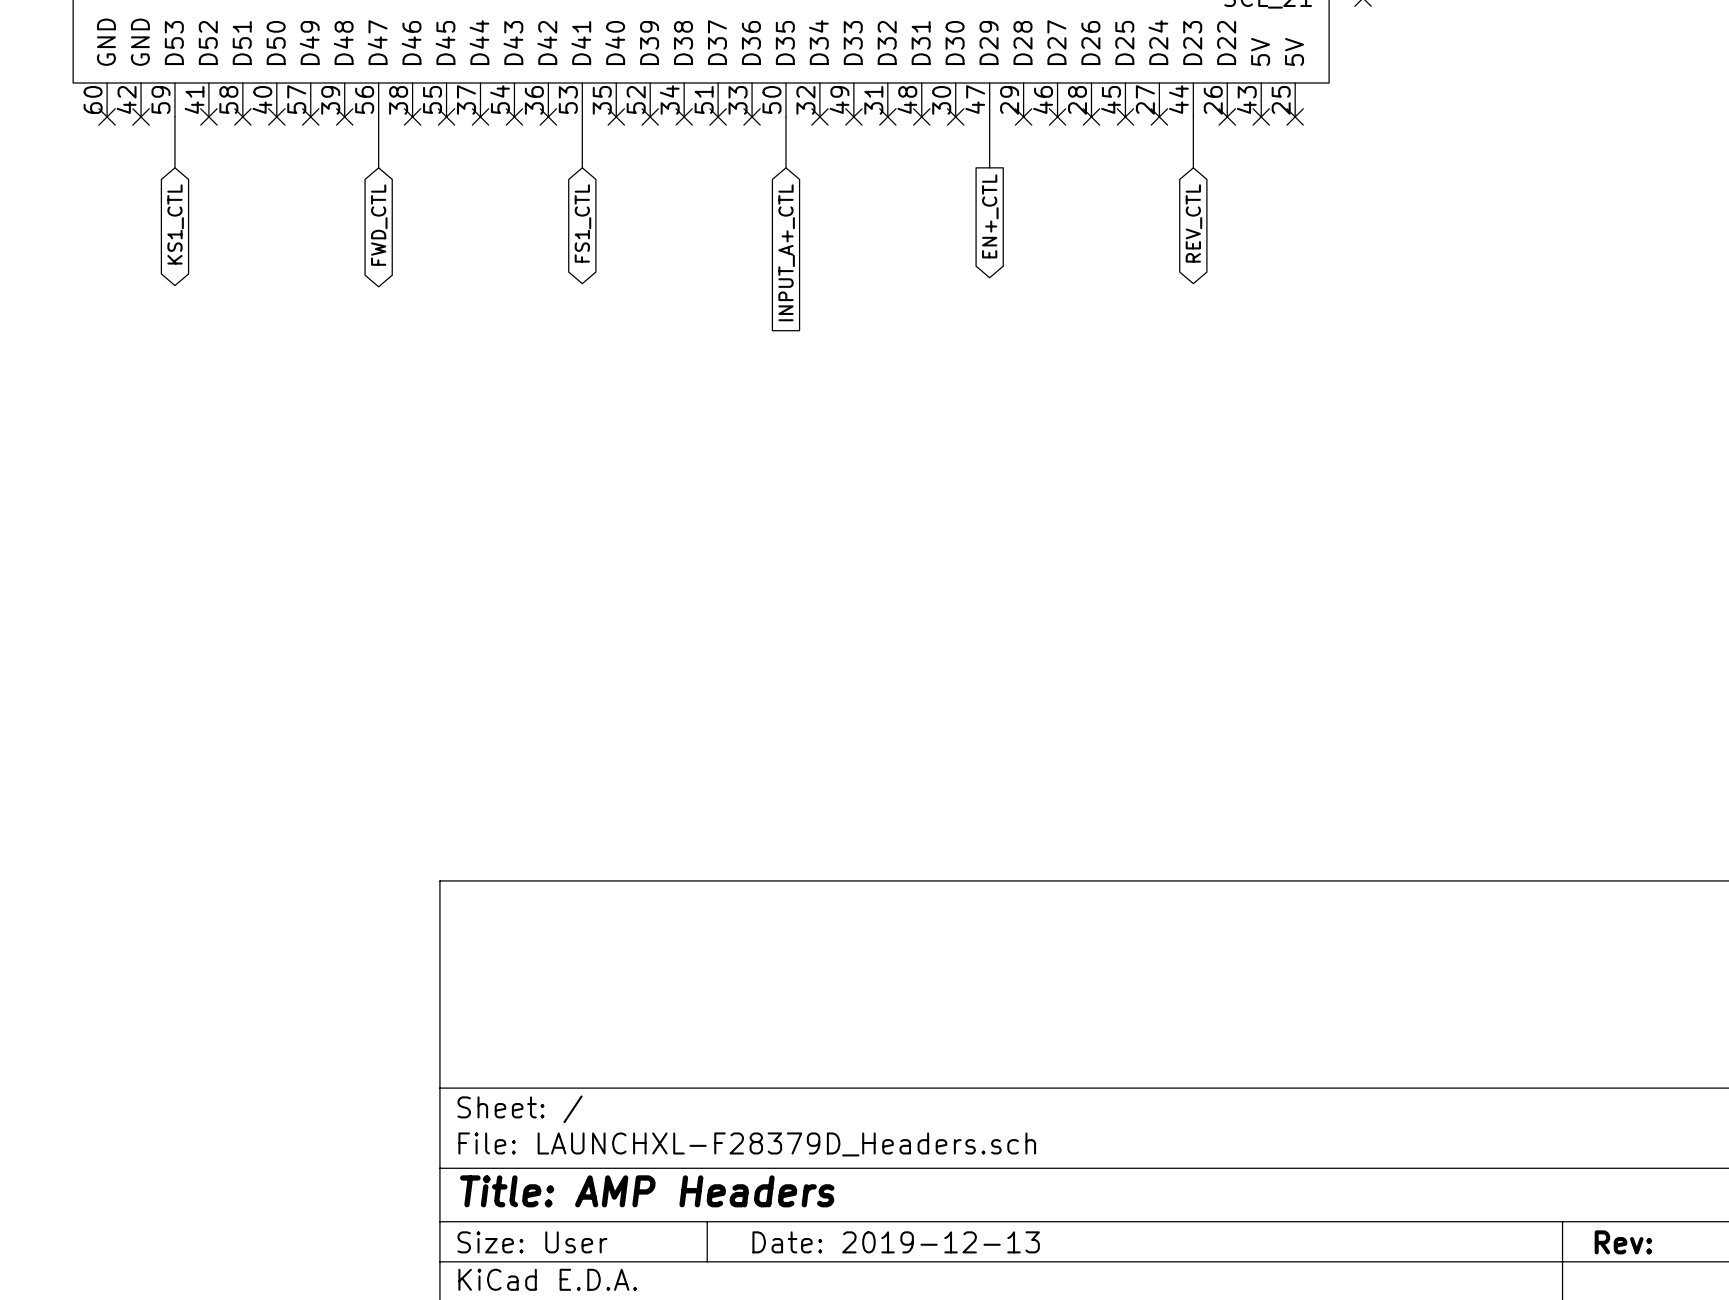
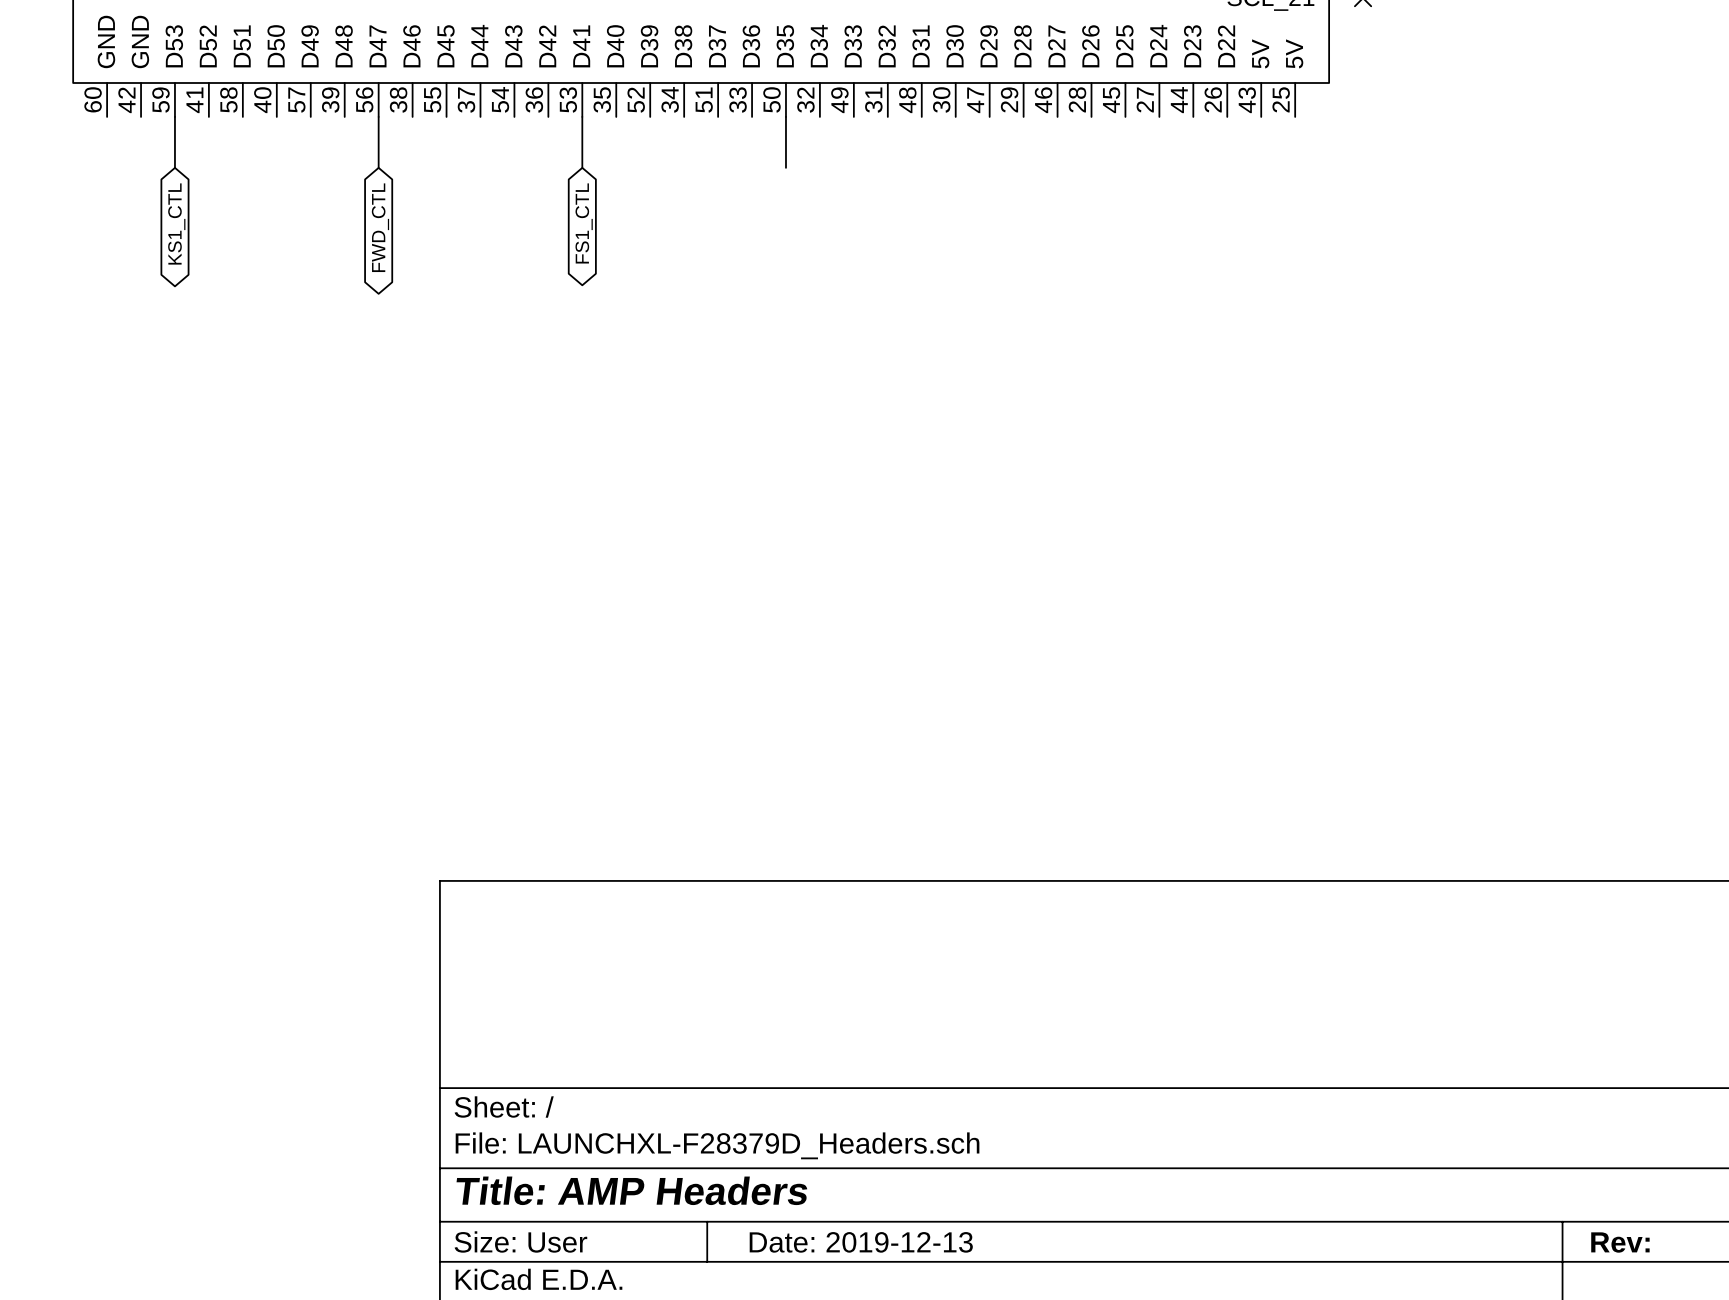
no-connect mark: (107, 116) -> none
no-connect mark: (141, 116) -> none
no-connect mark: (208, 116) -> none
no-connect mark: (242, 116) -> none
no-connect mark: (276, 116) -> none
no-connect mark: (310, 116) -> none
no-connect mark: (344, 116) -> none
no-connect mark: (412, 116) -> none
no-connect mark: (446, 116) -> none
no-connect mark: (480, 116) -> none
no-connect mark: (514, 116) -> none
no-connect mark: (548, 116) -> none
no-connect mark: (616, 116) -> none
no-connect mark: (650, 116) -> none
no-connect mark: (684, 116) -> none
no-connect mark: (718, 116) -> none
no-connect mark: (752, 116) -> none
no-connect mark: (819, 116) -> none
no-connect mark: (853, 116) -> none
no-connect mark: (887, 116) -> none
no-connect mark: (921, 116) -> none
no-connect mark: (955, 116) -> none
wire: (989, 116) (989, 167) -> none
no-connect mark: (1023, 116) -> none
no-connect mark: (1057, 116) -> none
no-connect mark: (1091, 116) -> none
no-connect mark: (1125, 116) -> none
no-connect mark: (1159, 116) -> none
wire: (1193, 116) (1193, 167) -> none
no-connect mark: (1227, 116) -> none
no-connect mark: (1261, 116) -> none
no-connect mark: (1295, 116) -> none
global label: EN+_CTL (990, 216) -> none
global label: REV_CTL (1193, 223) -> none
global label: INPUT_A+_CTL (786, 252) -> none

